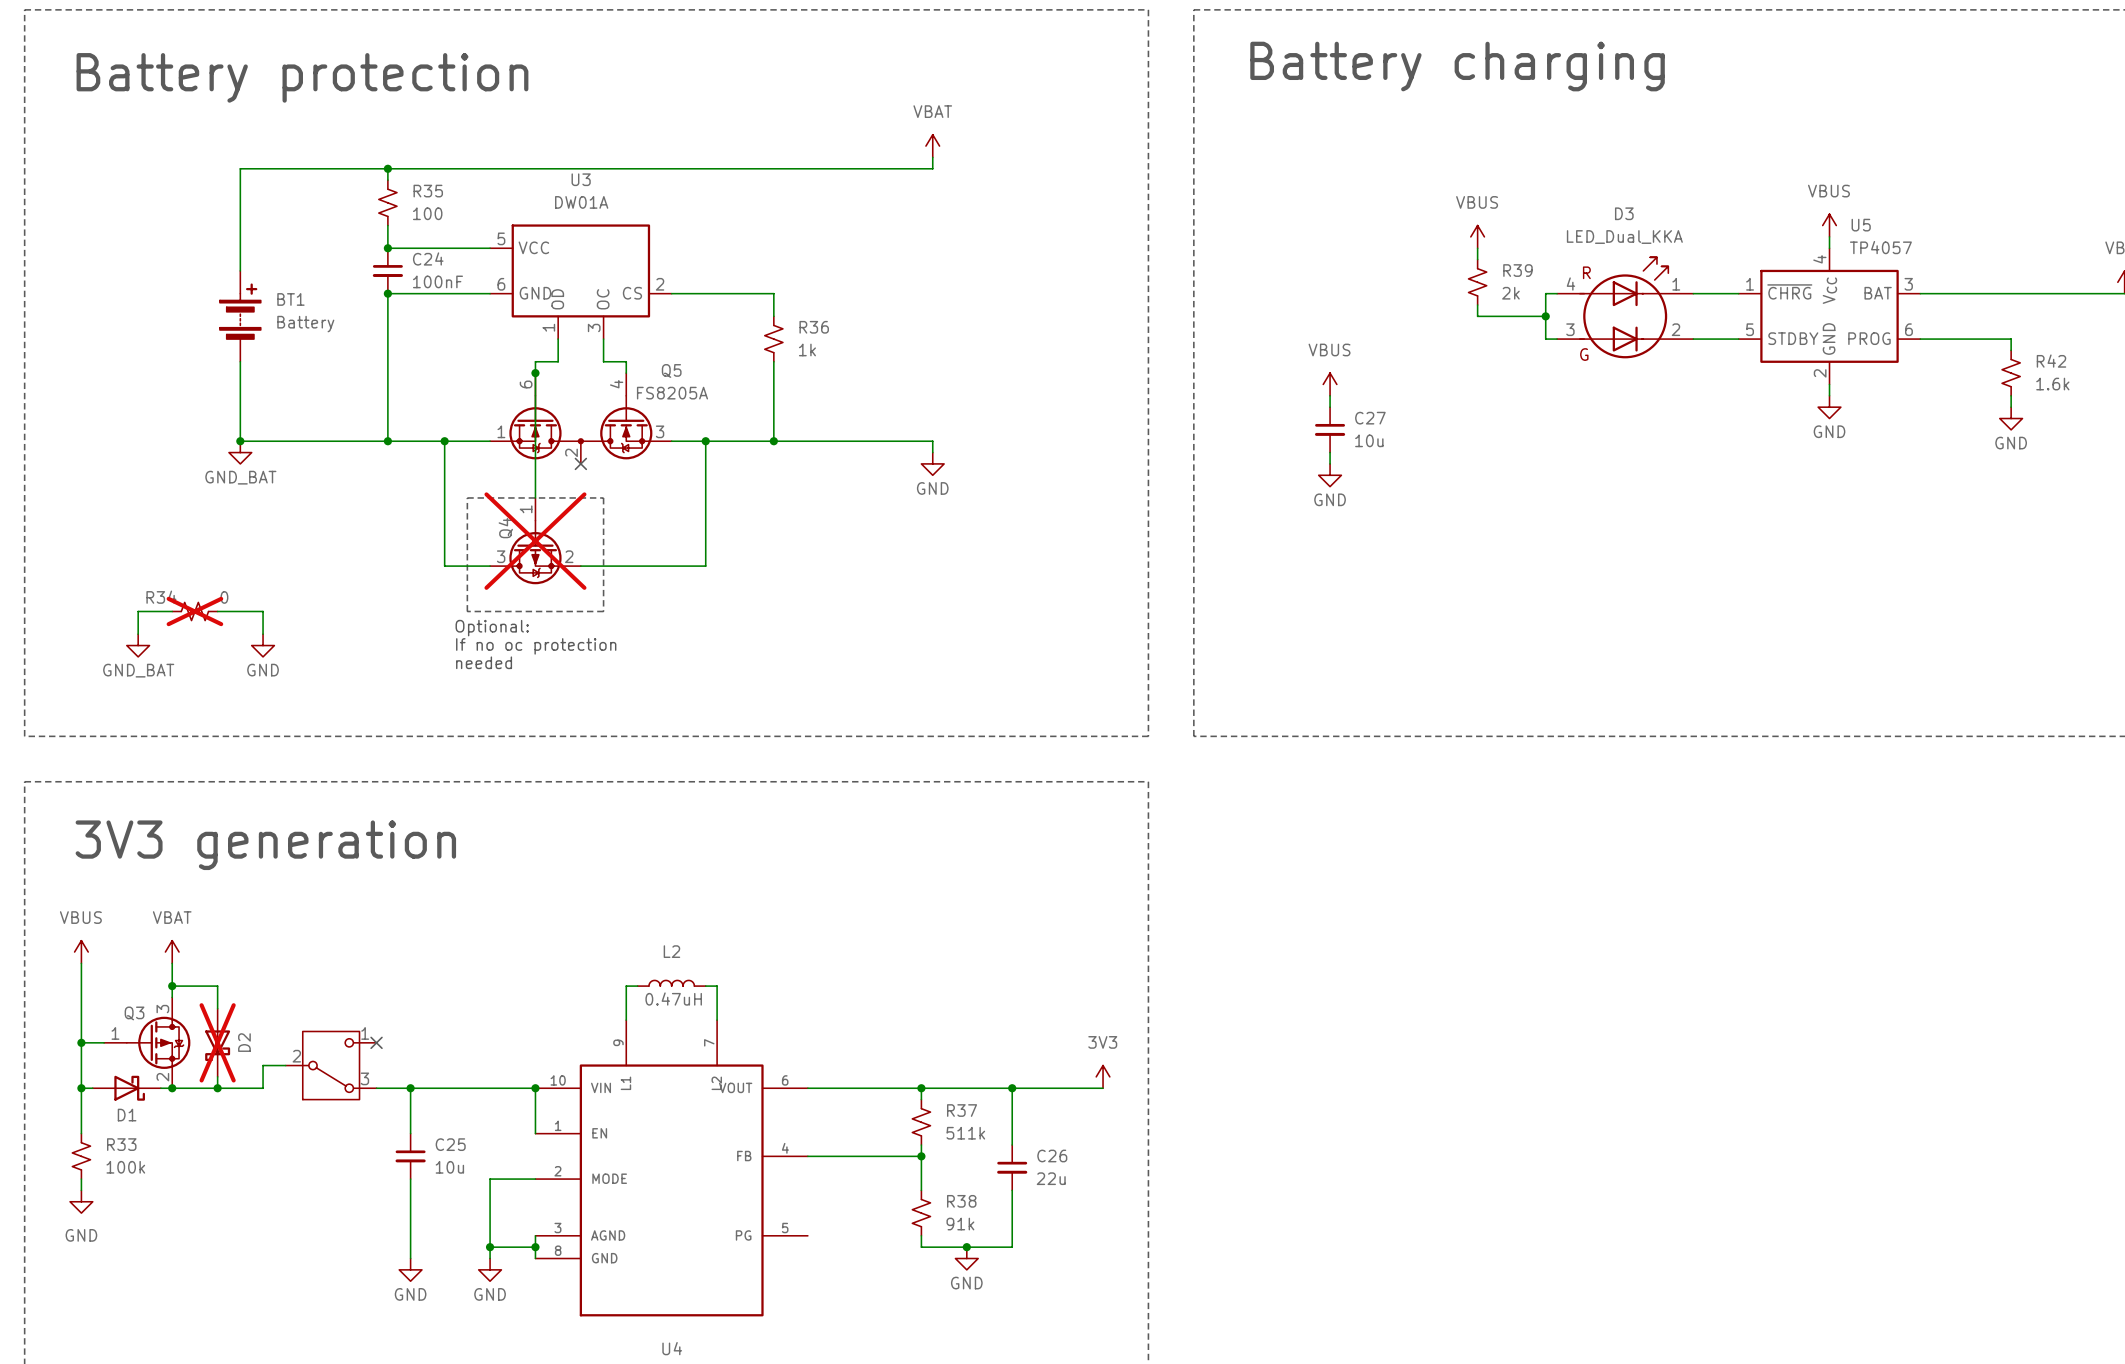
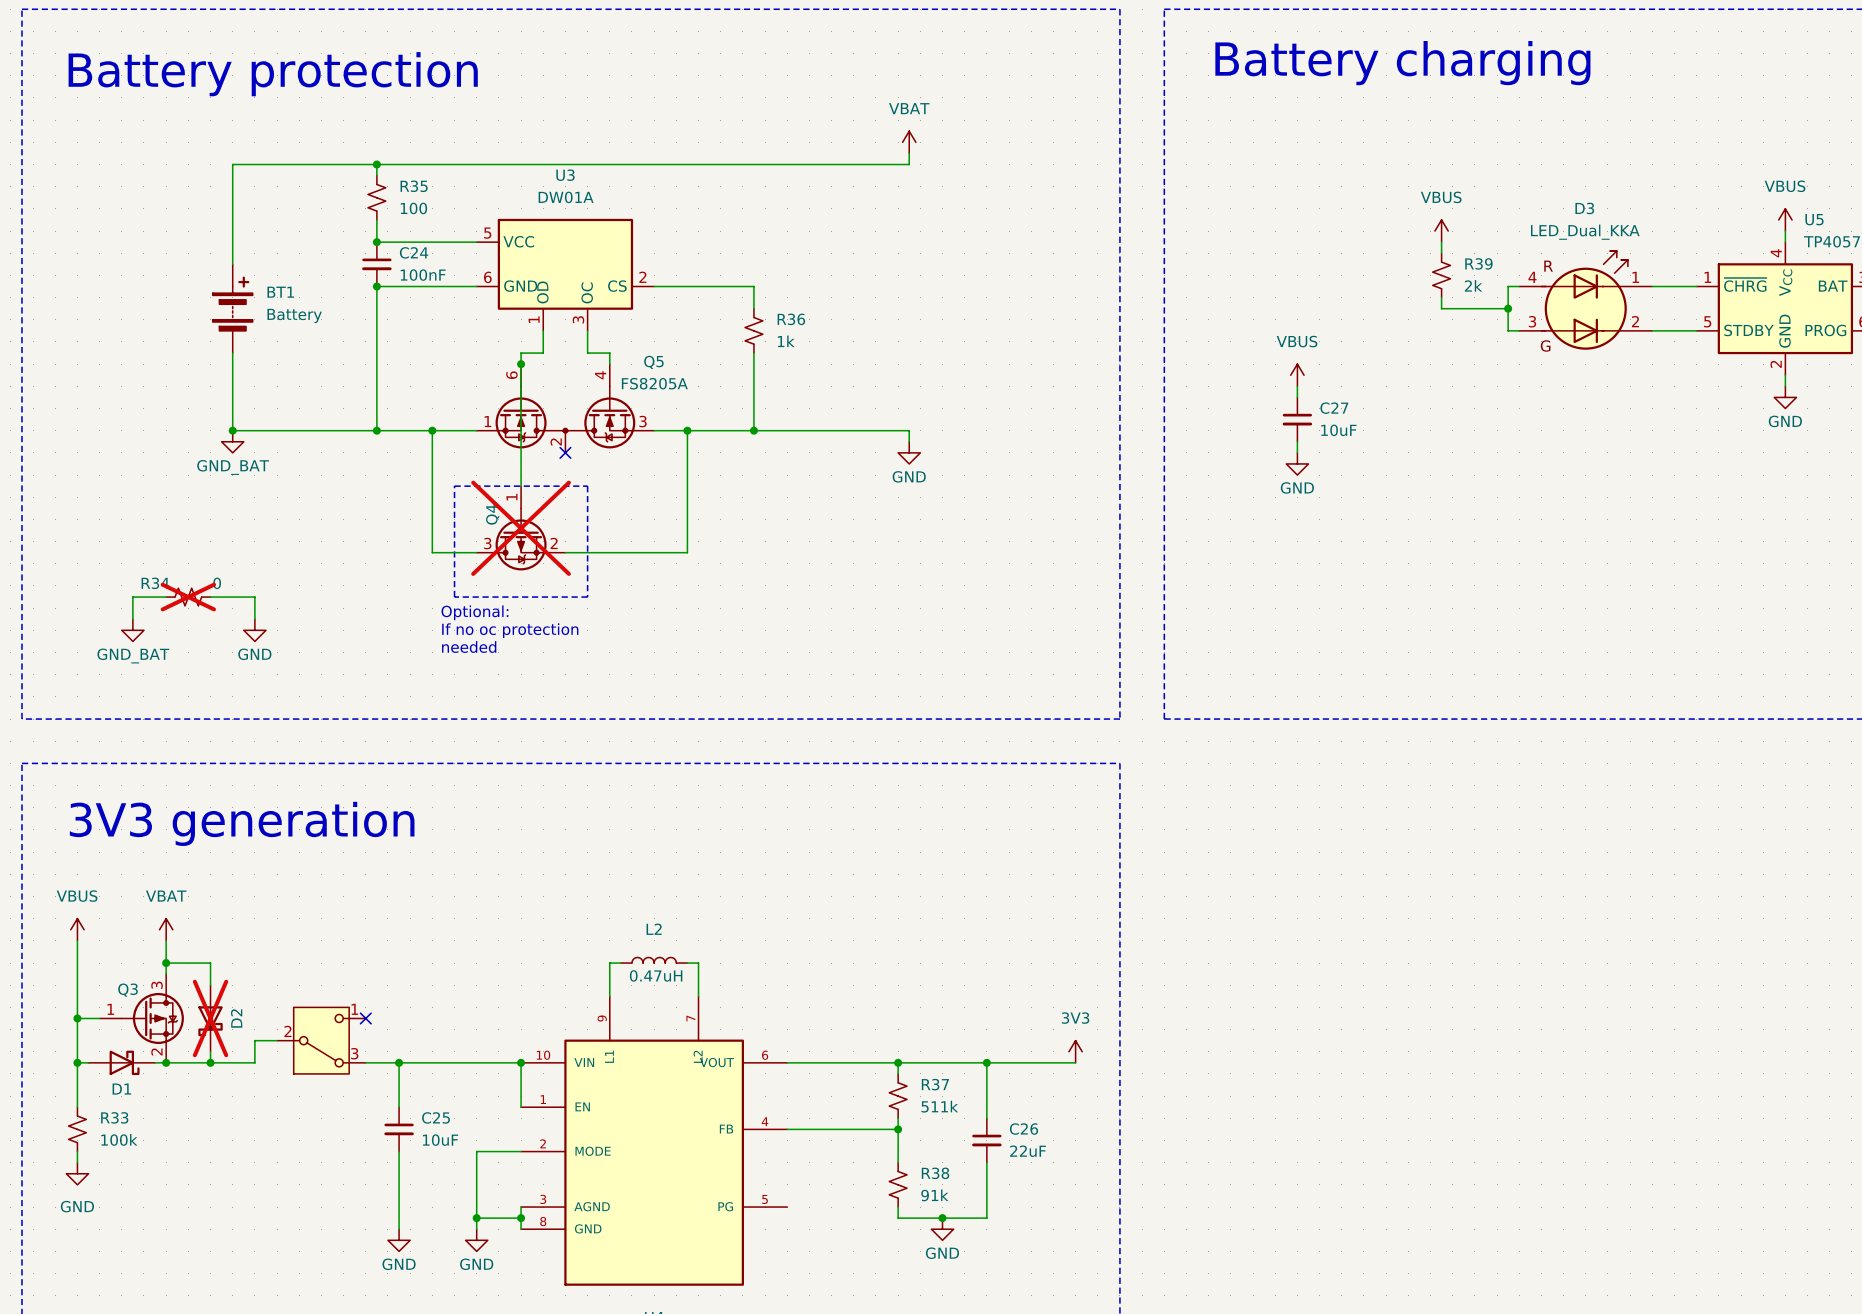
C27 value: 10u (1369, 440) -> 10uF (1338, 430)
C25 value: 10u (449, 1167) -> 10uF (440, 1140)
C26 value: 22u (1051, 1178) -> 22uF (1028, 1151)

